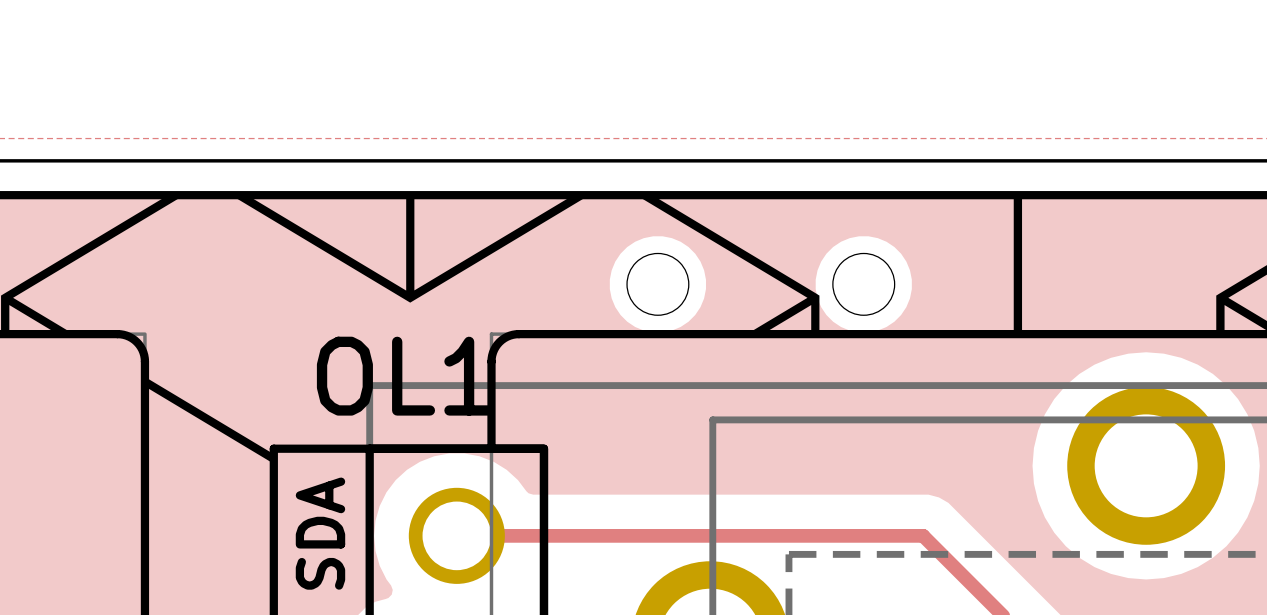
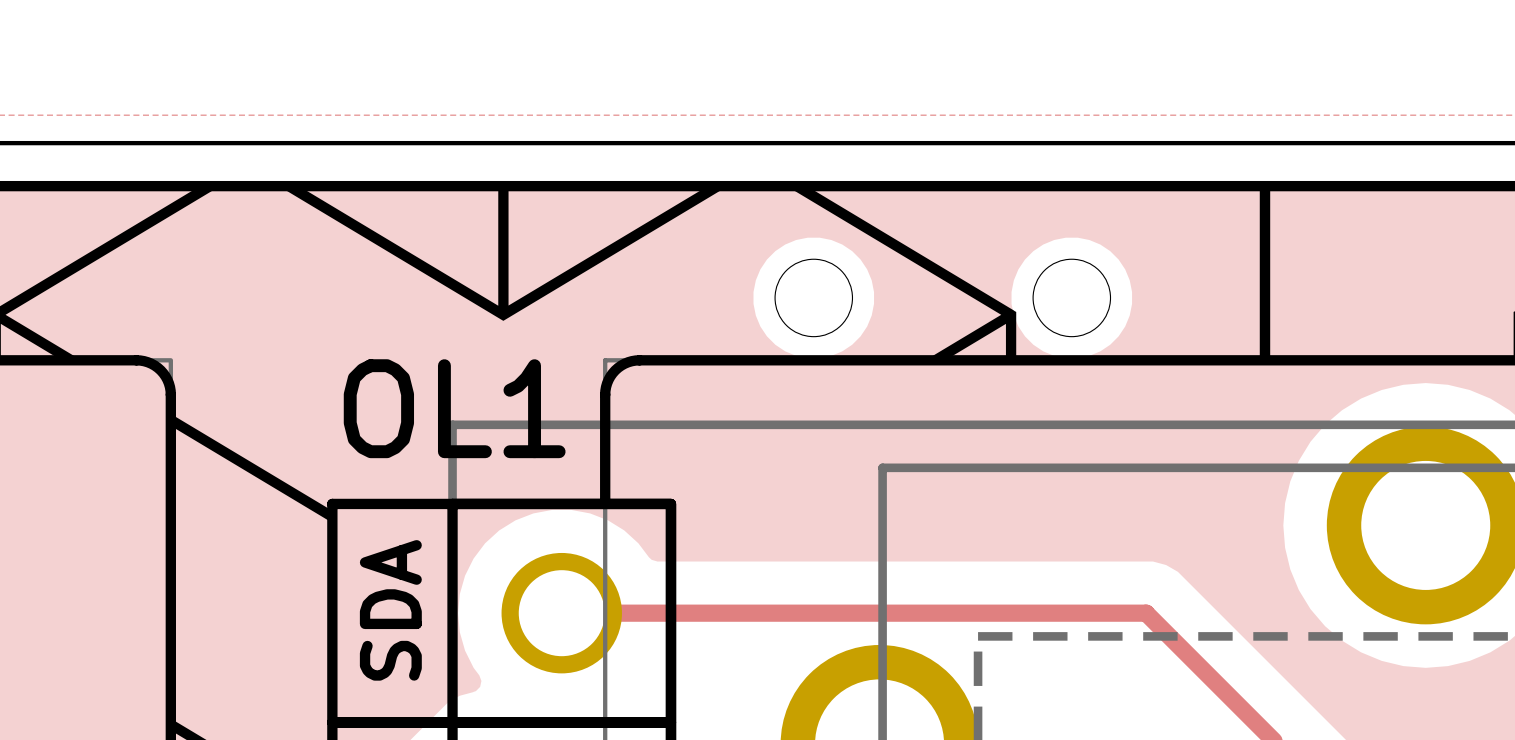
OL1 name position: OL1 (405, 376) -> OL1 (454, 408)

